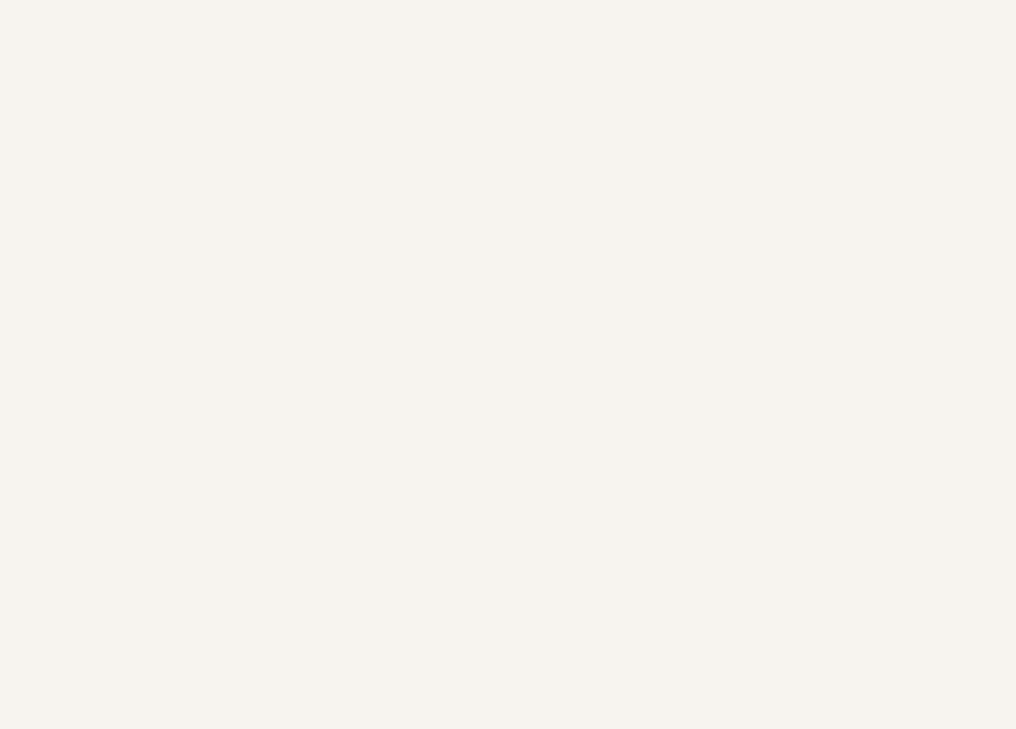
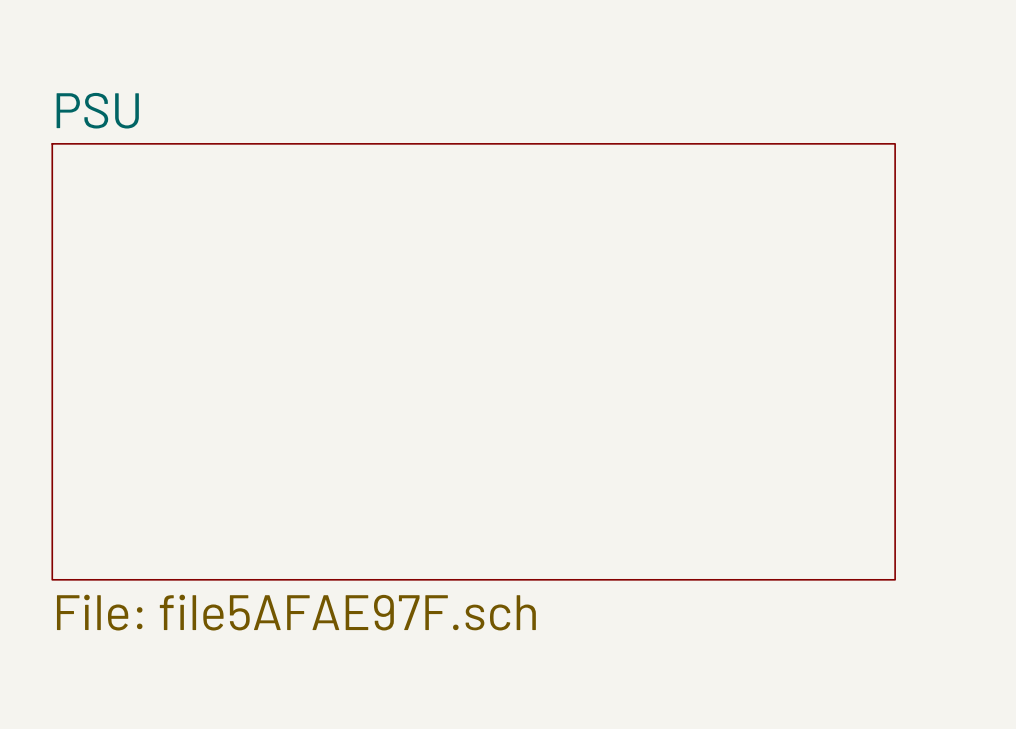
sheet PSU: none -> File: file5AFAE97F.sch (473, 361)

